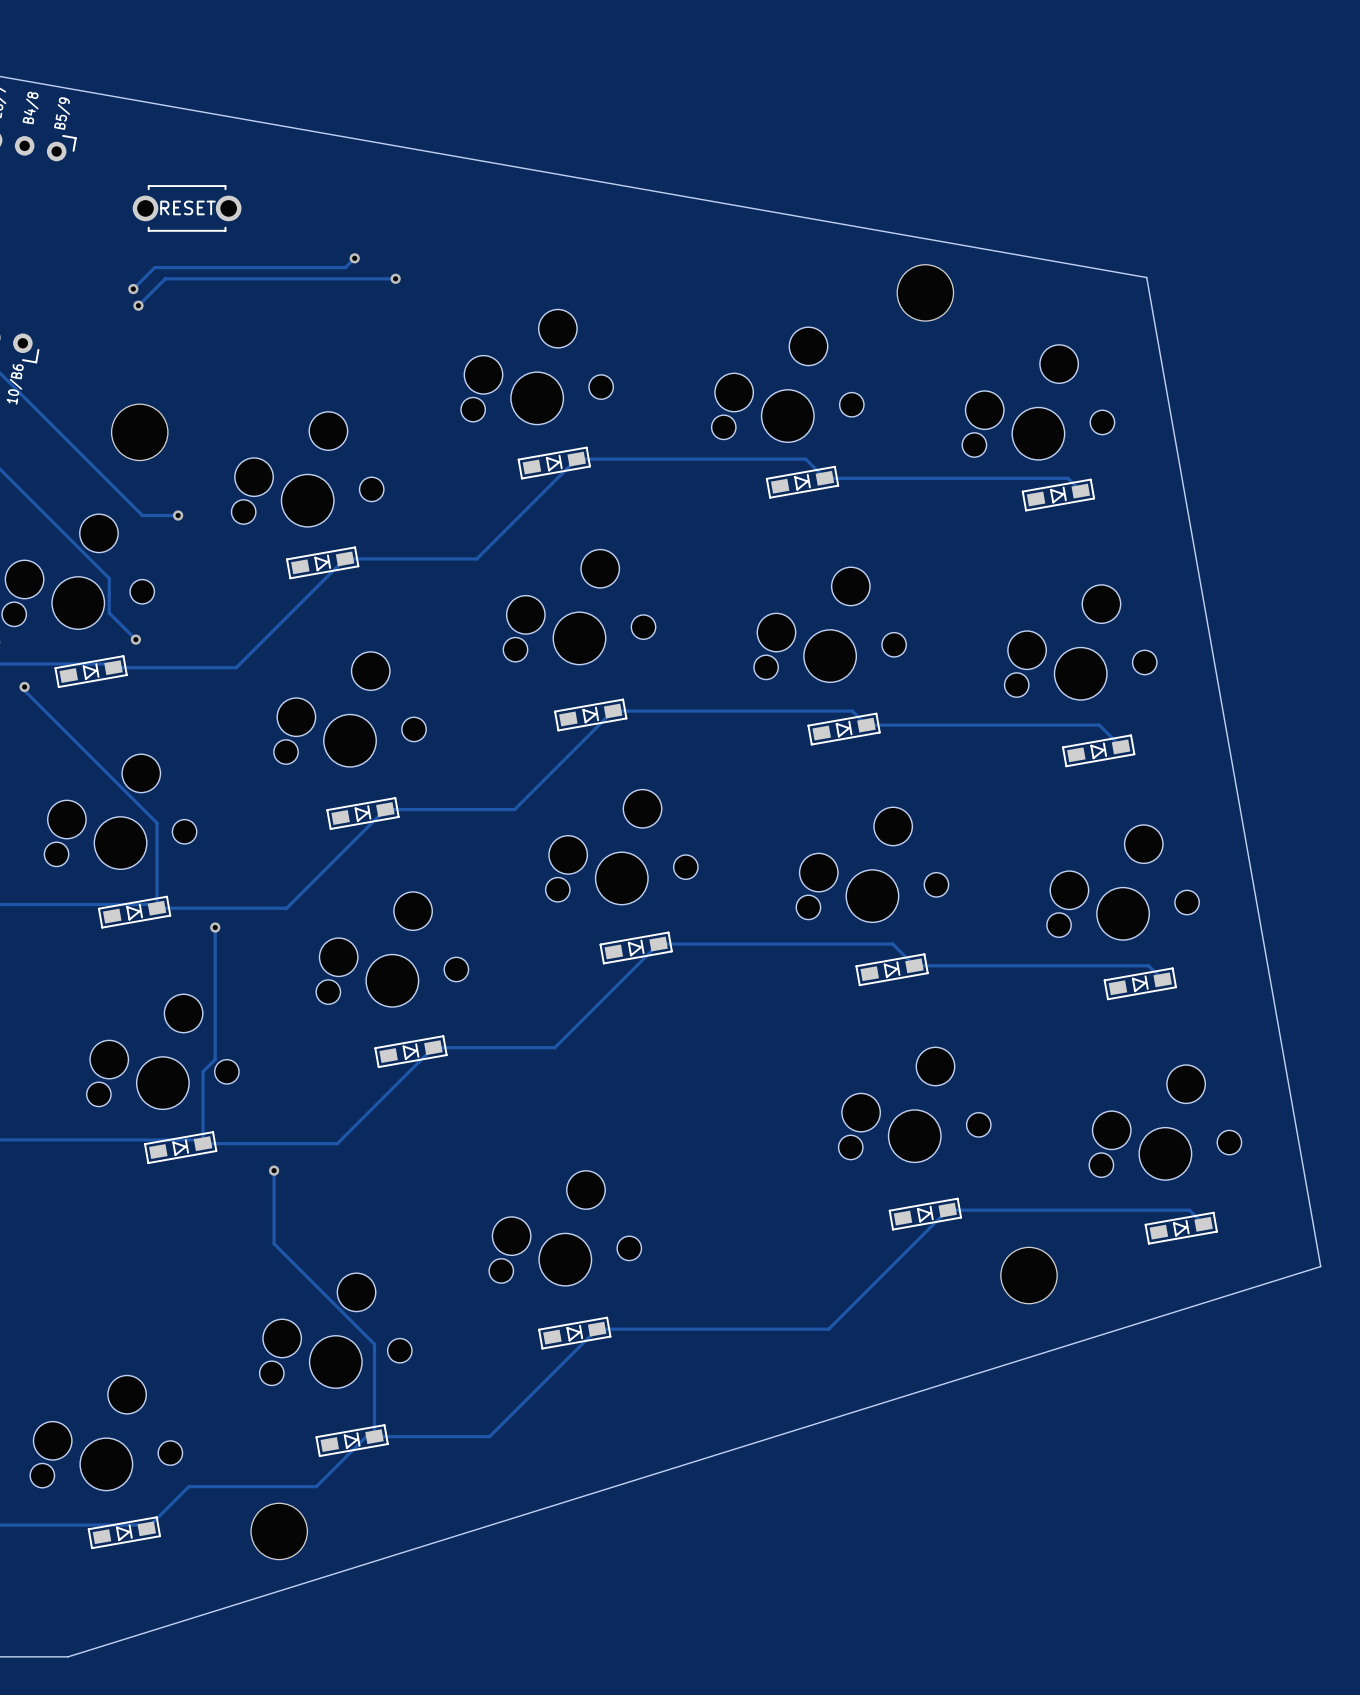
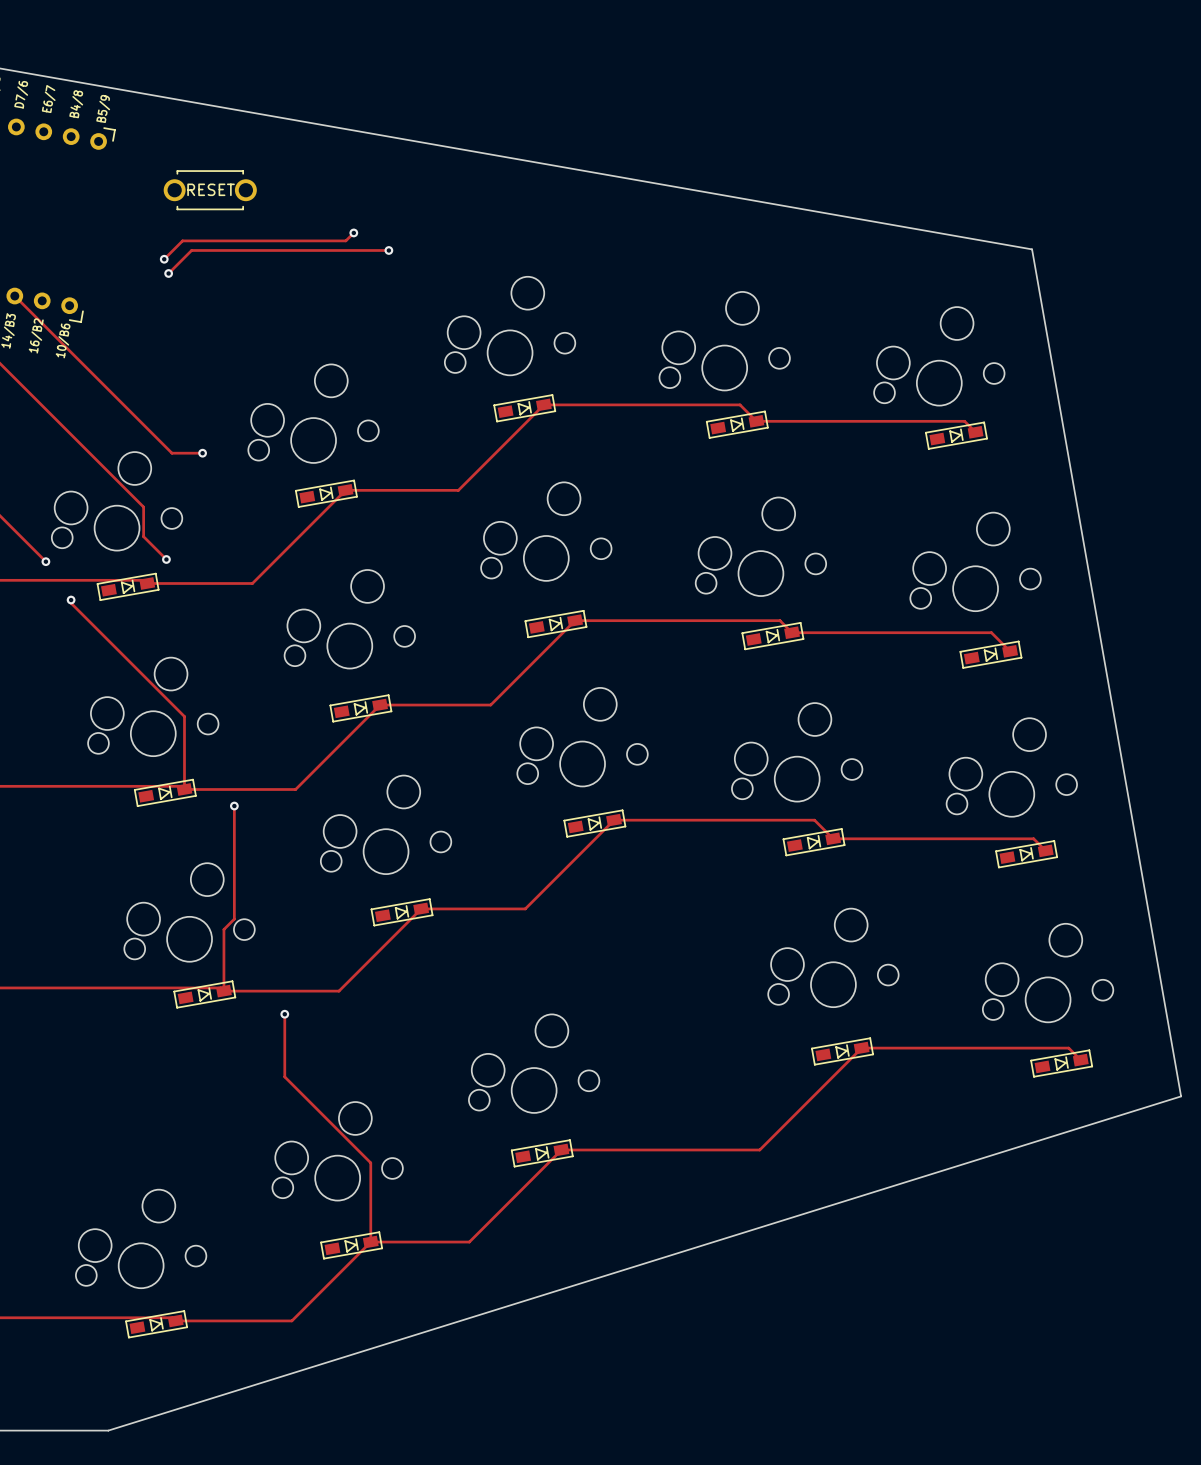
part: (925, 292) -> none
part: (139, 432) -> none
part: (1029, 1275) -> none
track: (374, 1436) (366, 1436) (316, 1486) (188, 1486) (146, 1528) -> (370, 1242) (291, 1320) (175, 1320)
part: (279, 1531) -> none

